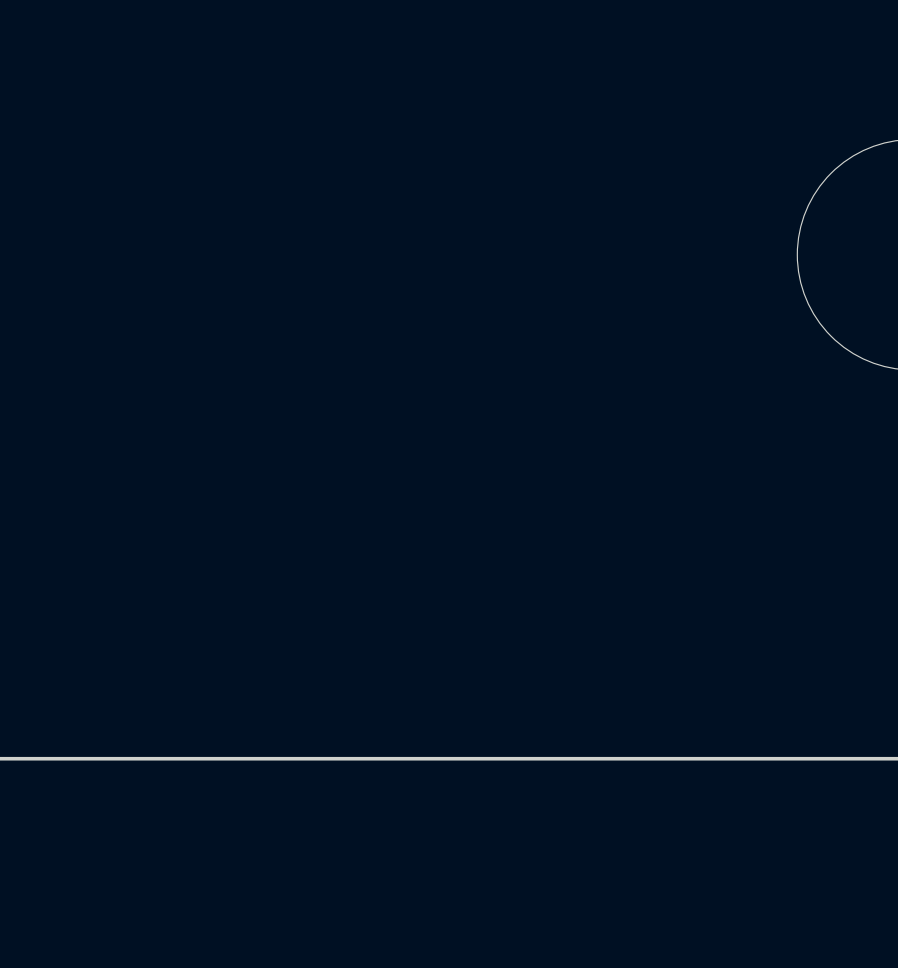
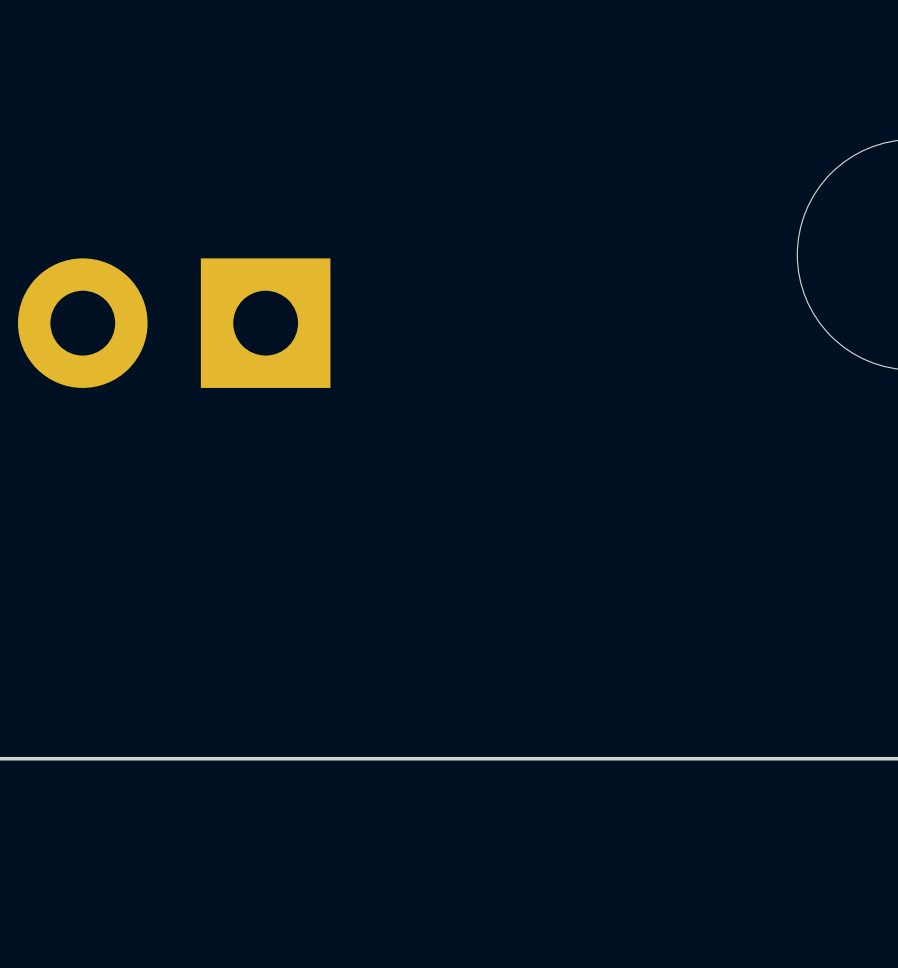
part: none -> (174, 323)

